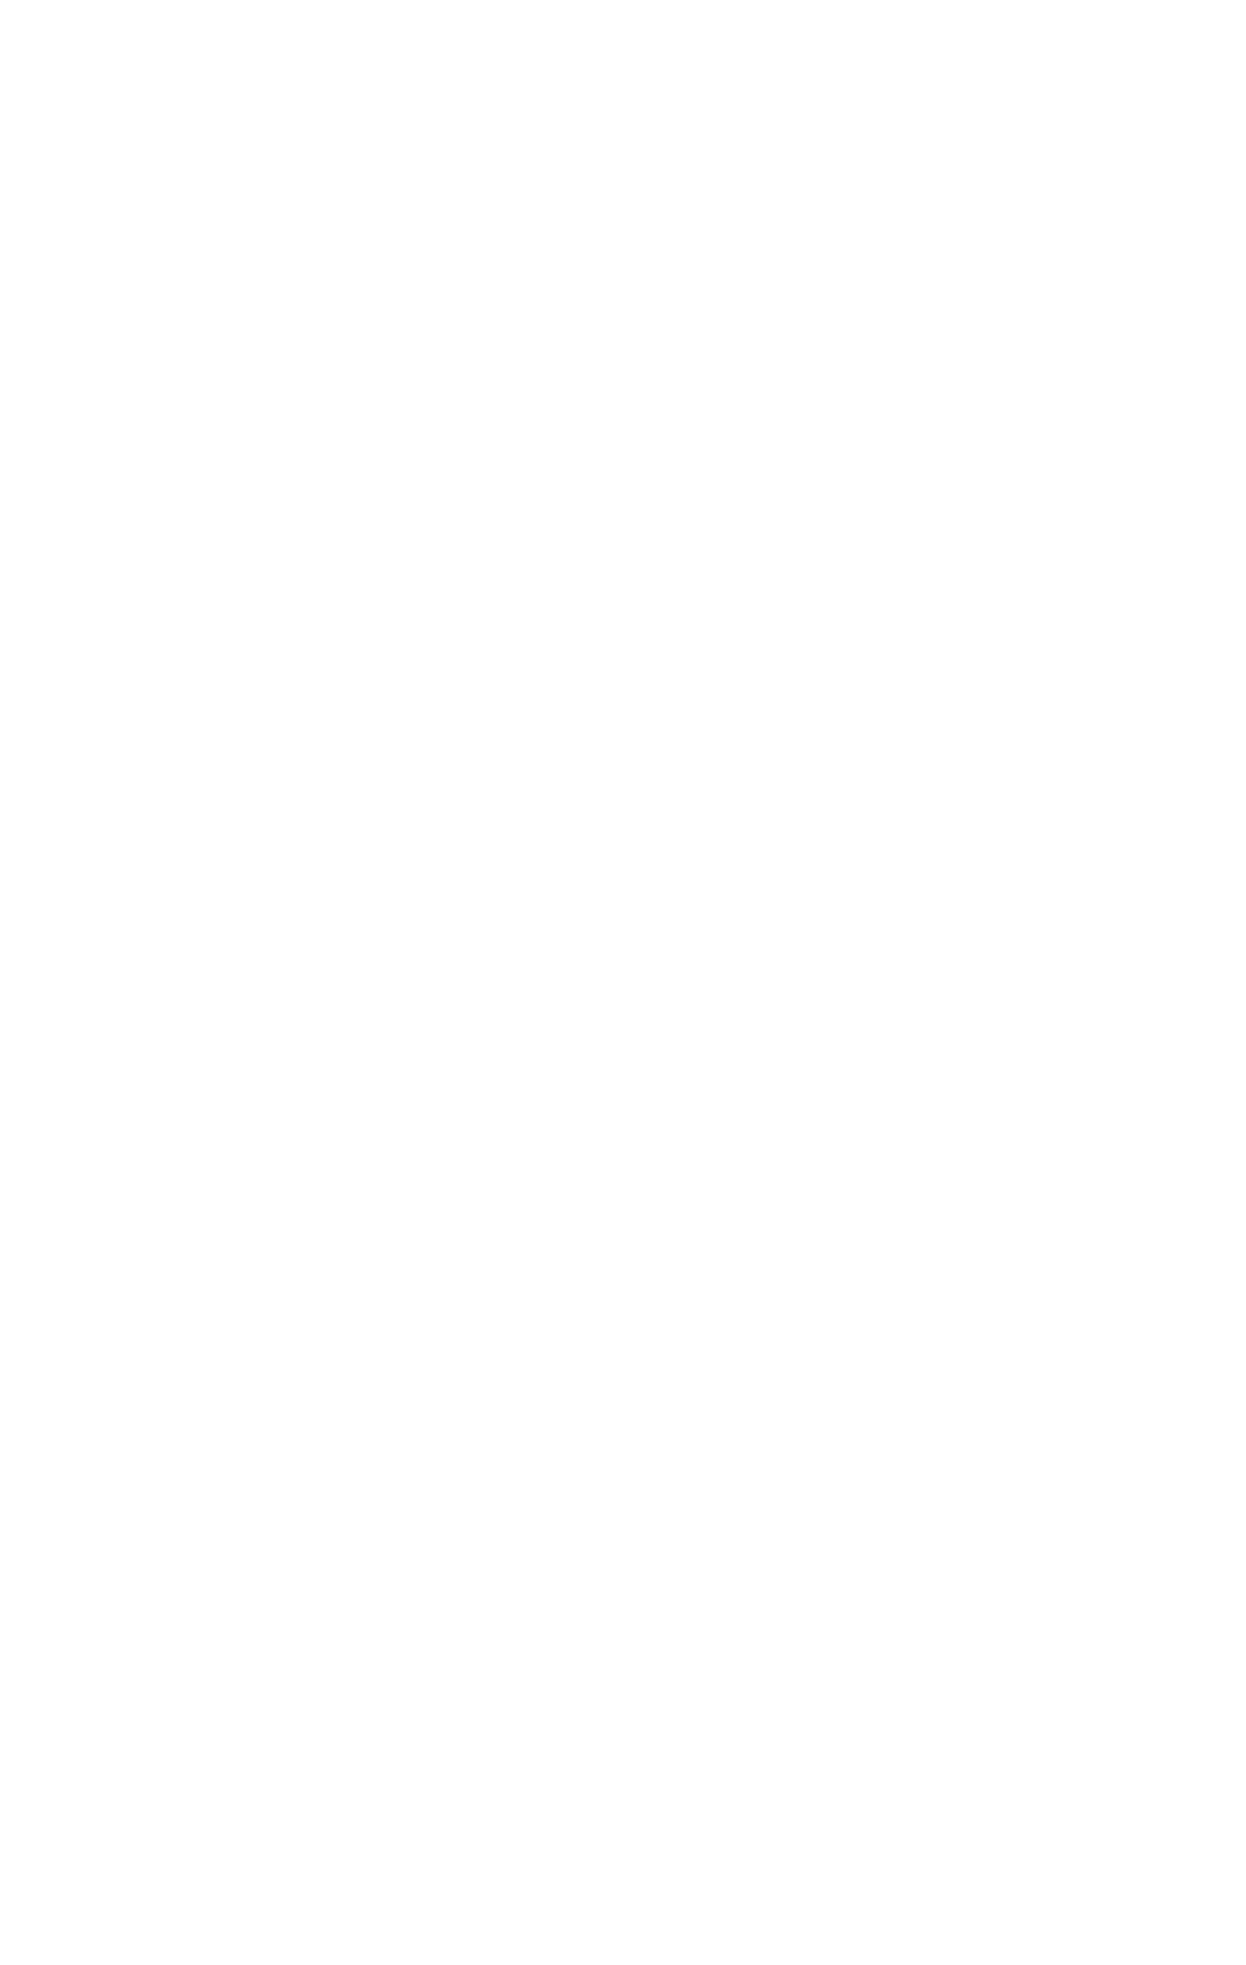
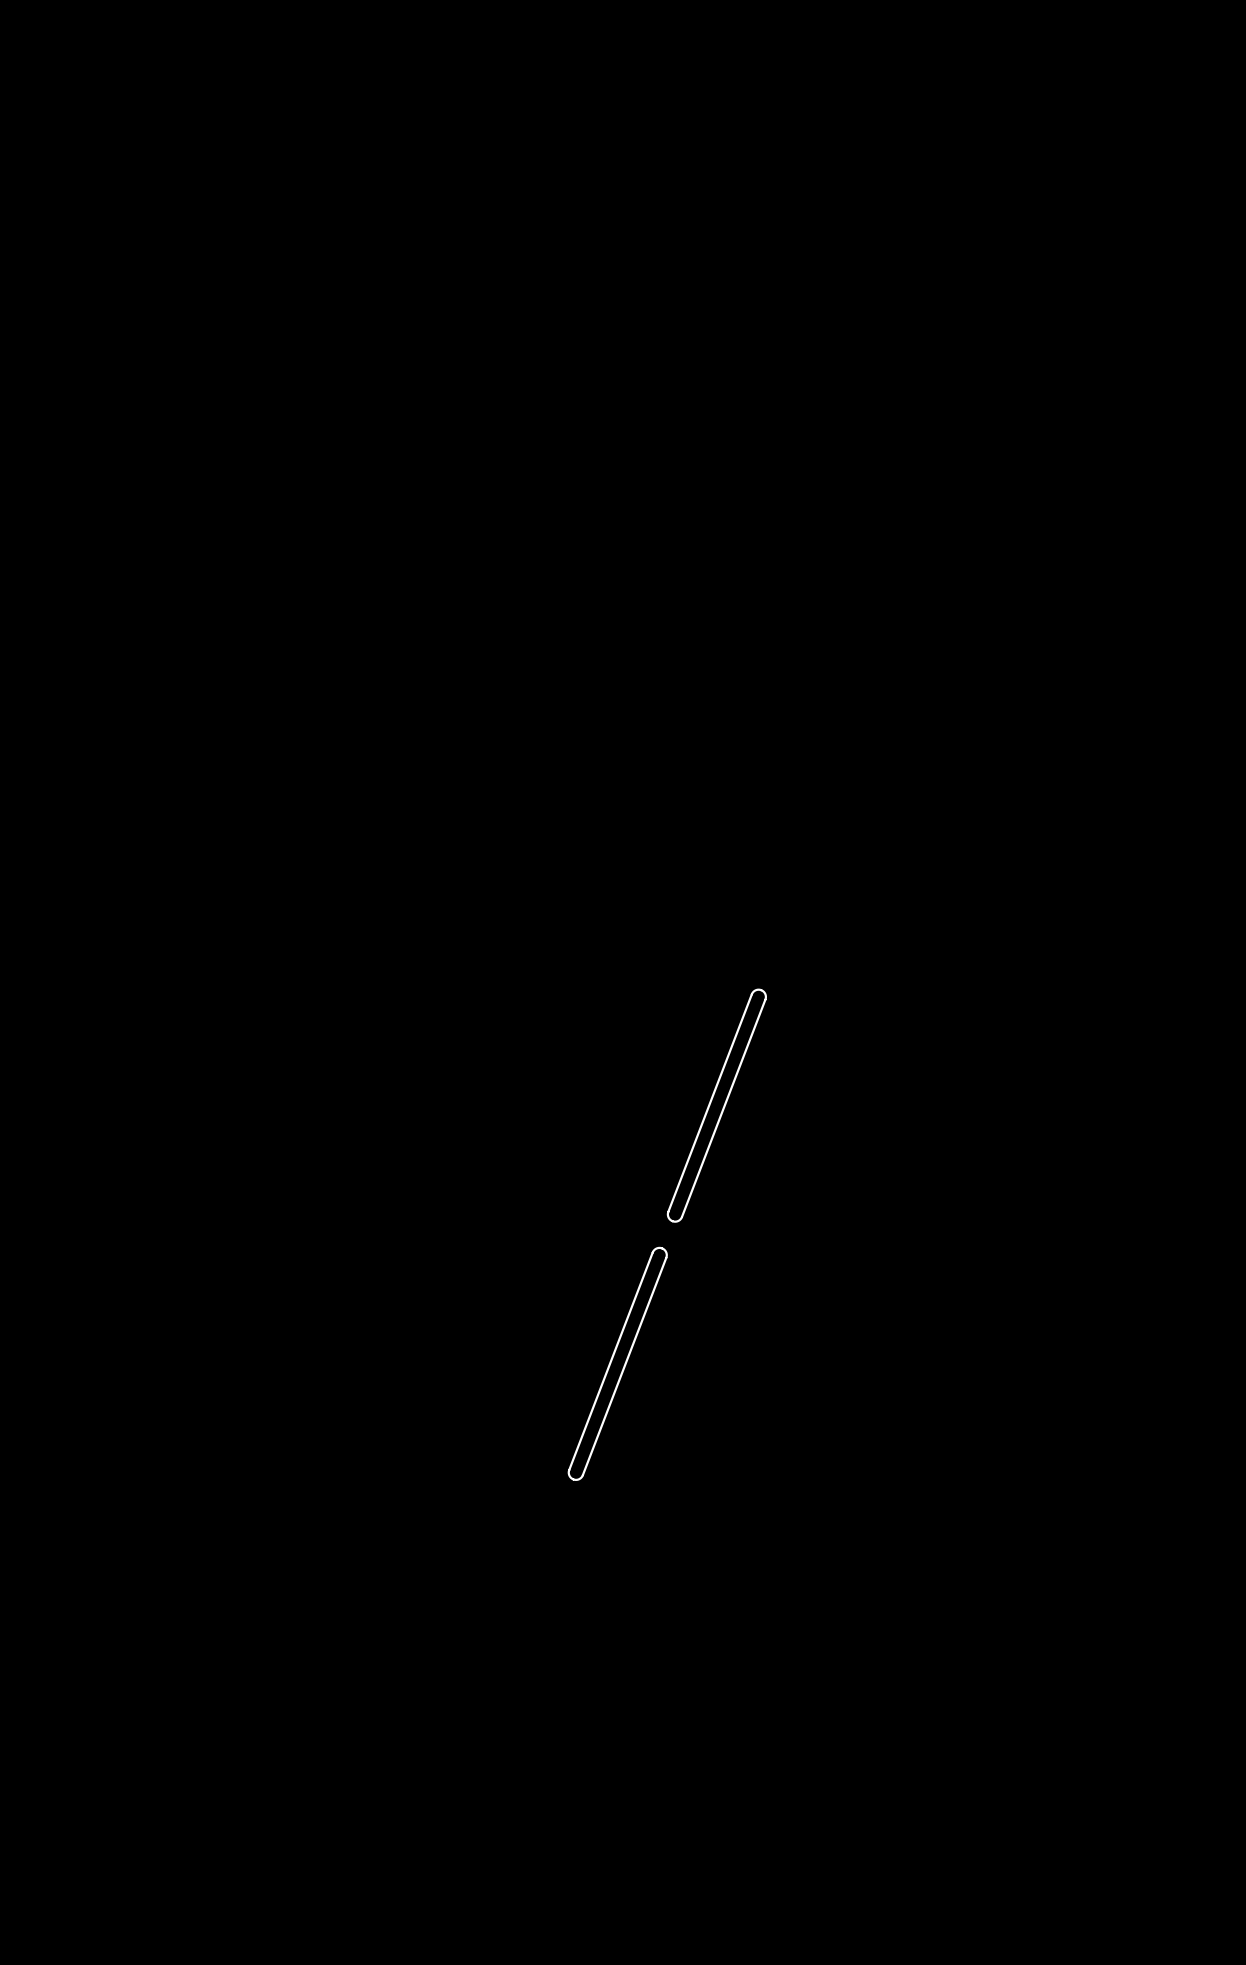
board edge: none -> (761, 990) (765, 994) (765, 999) (681, 1217) (678, 1221) (672, 1221) (668, 1217) (668, 1211) (751, 994) (755, 990) (761, 990)
board edge: none -> (662, 1248) (666, 1252) (666, 1257) (582, 1475) (579, 1479) (573, 1479) (569, 1475) (569, 1470) (652, 1252) (656, 1248) (662, 1248)

